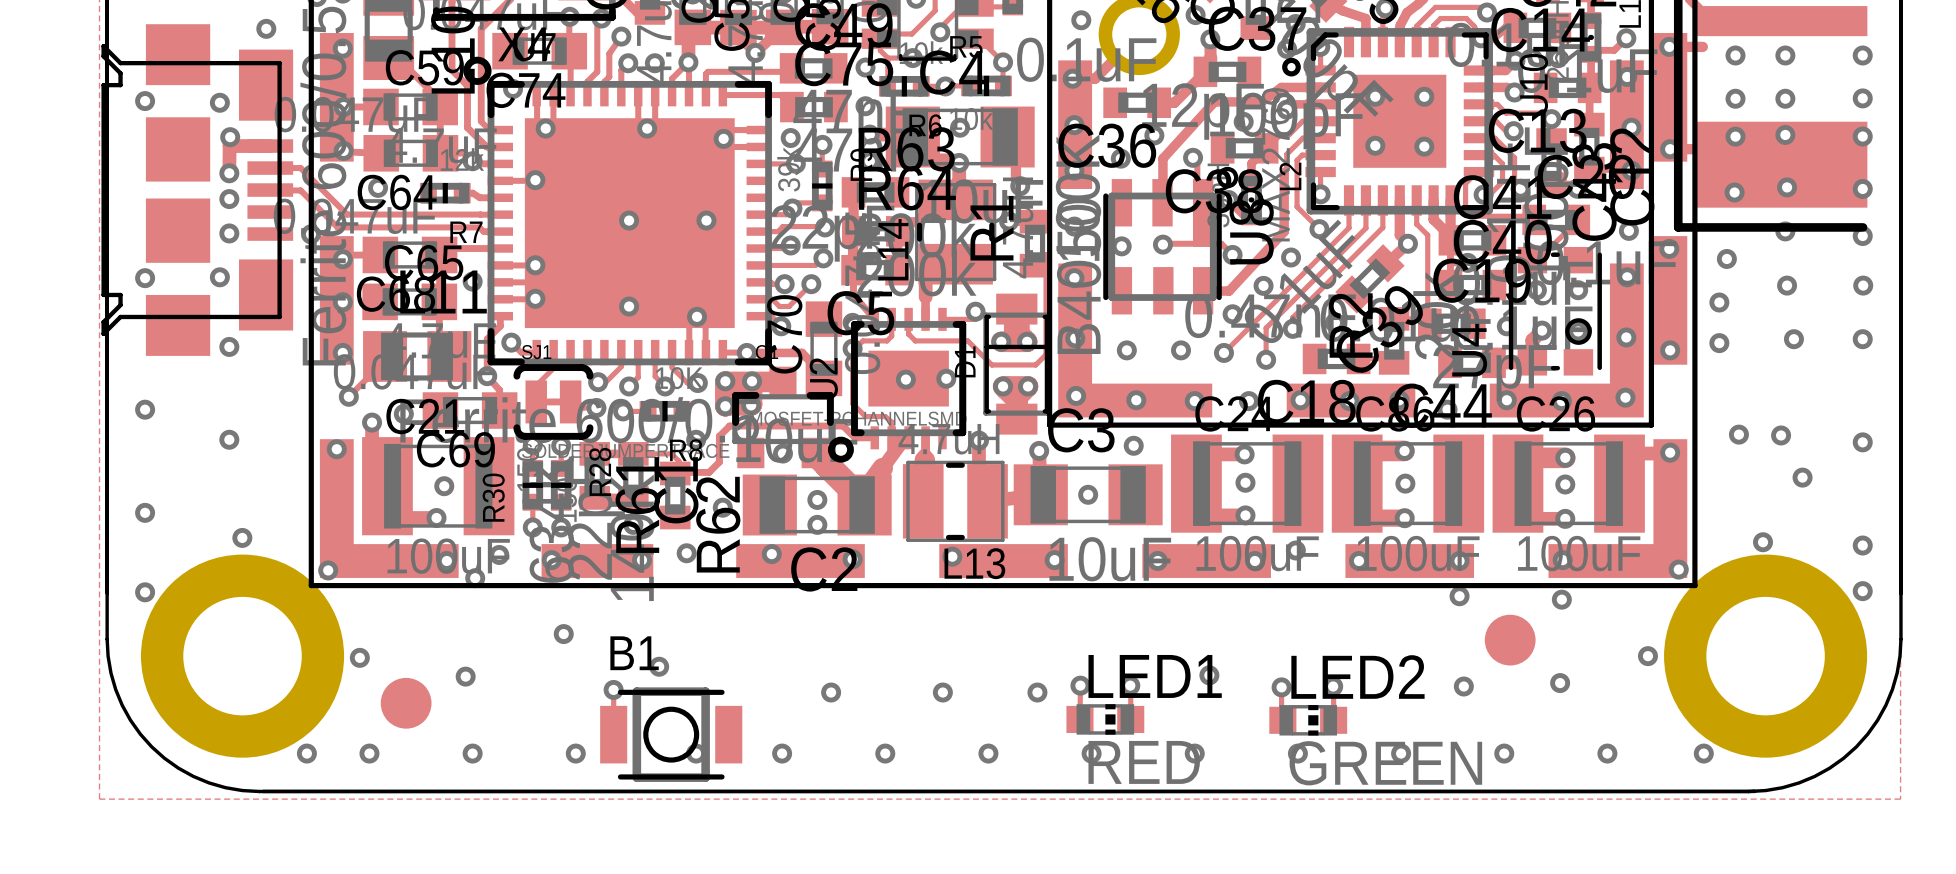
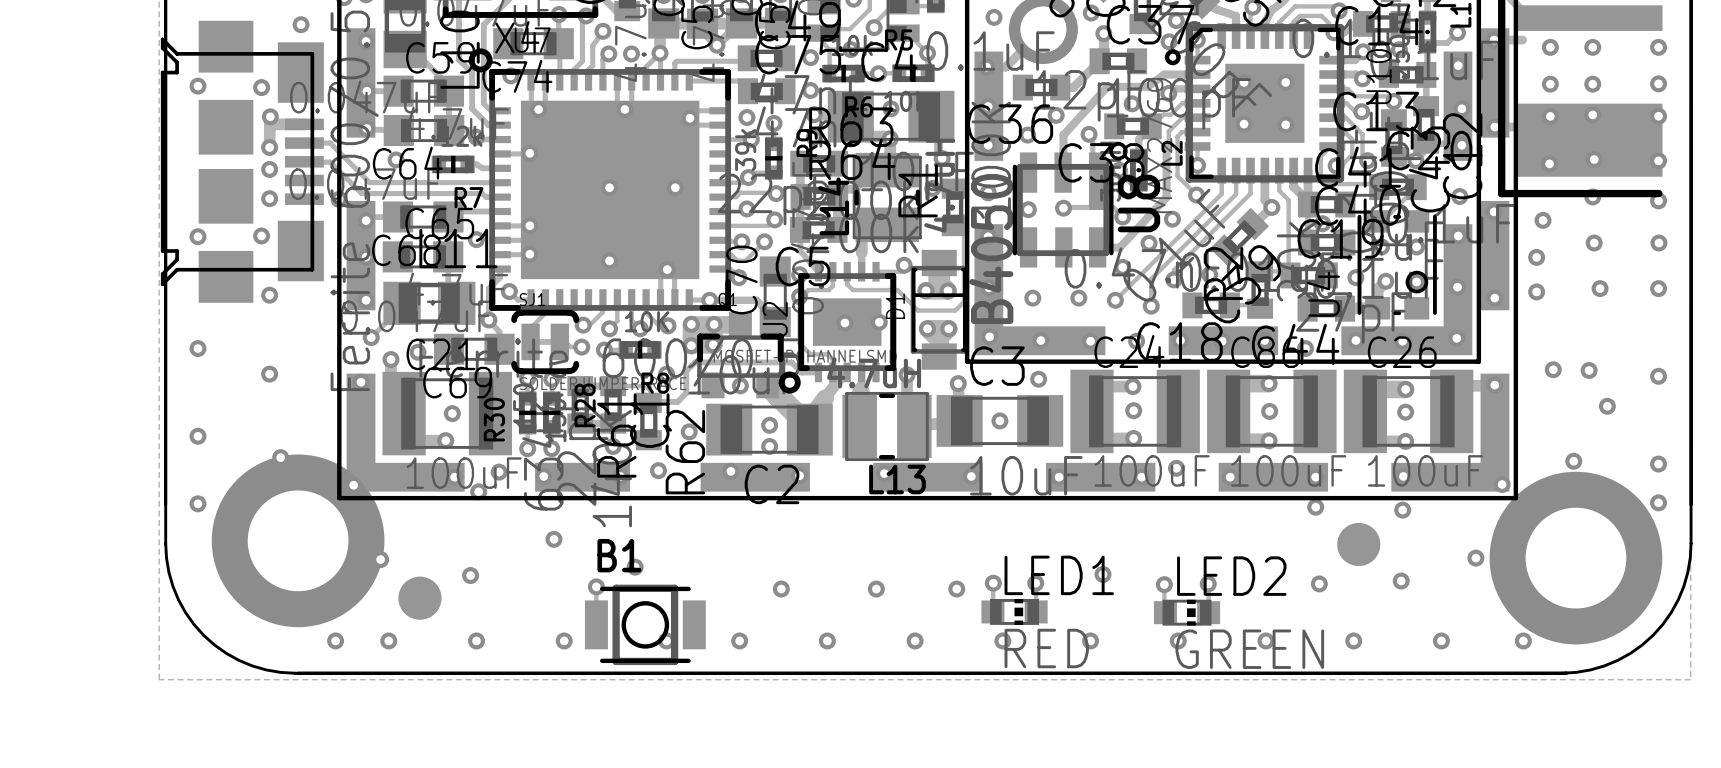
part position: (242, 656) -> (298, 540)

